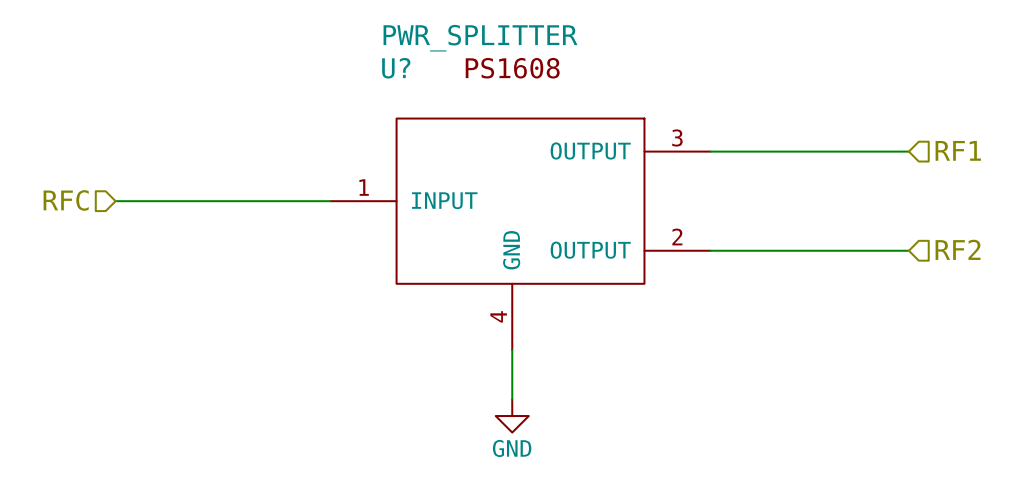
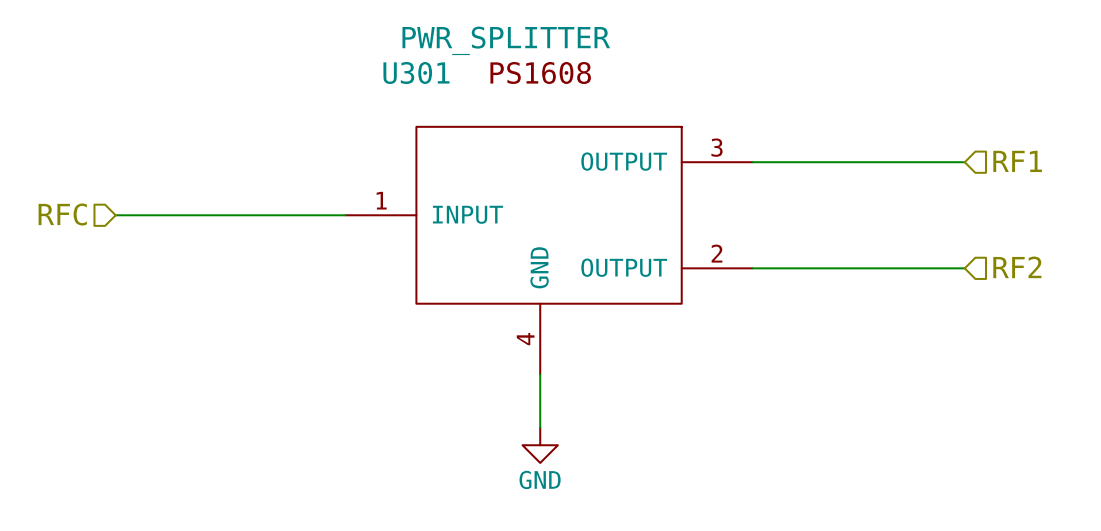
U? name: U? (396, 68) -> U301 (416, 72)

